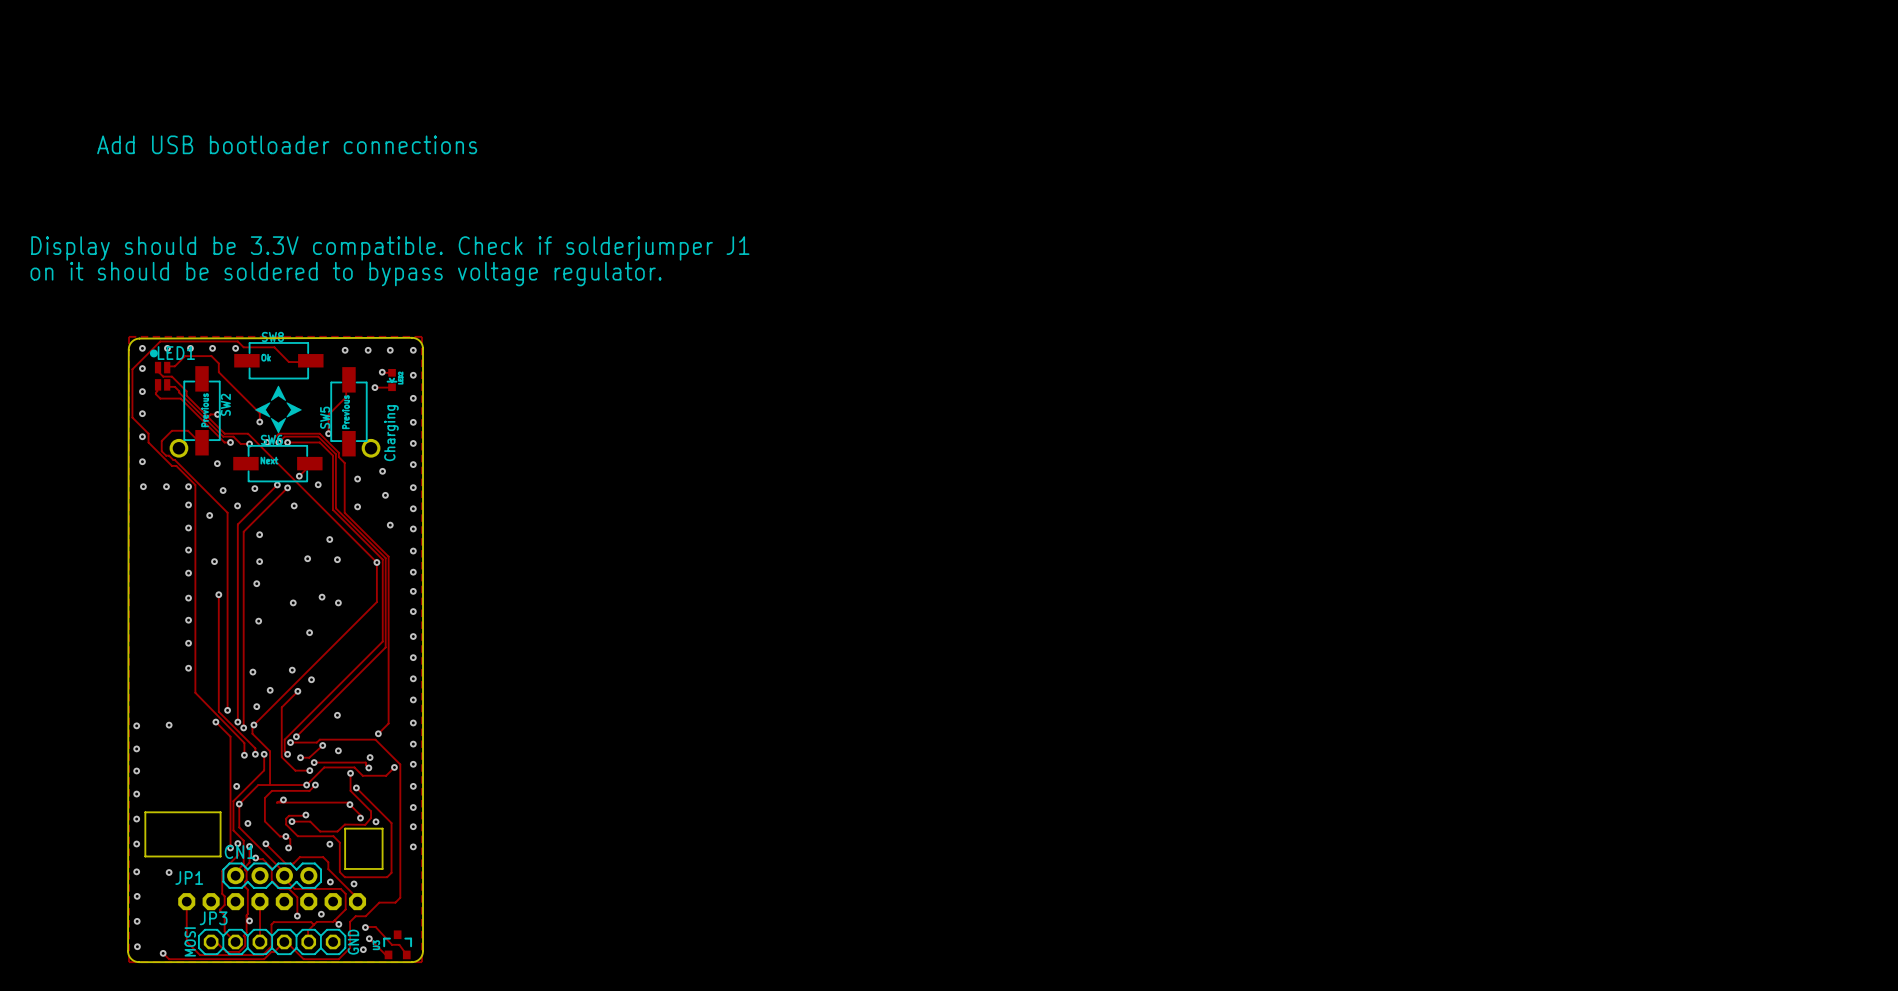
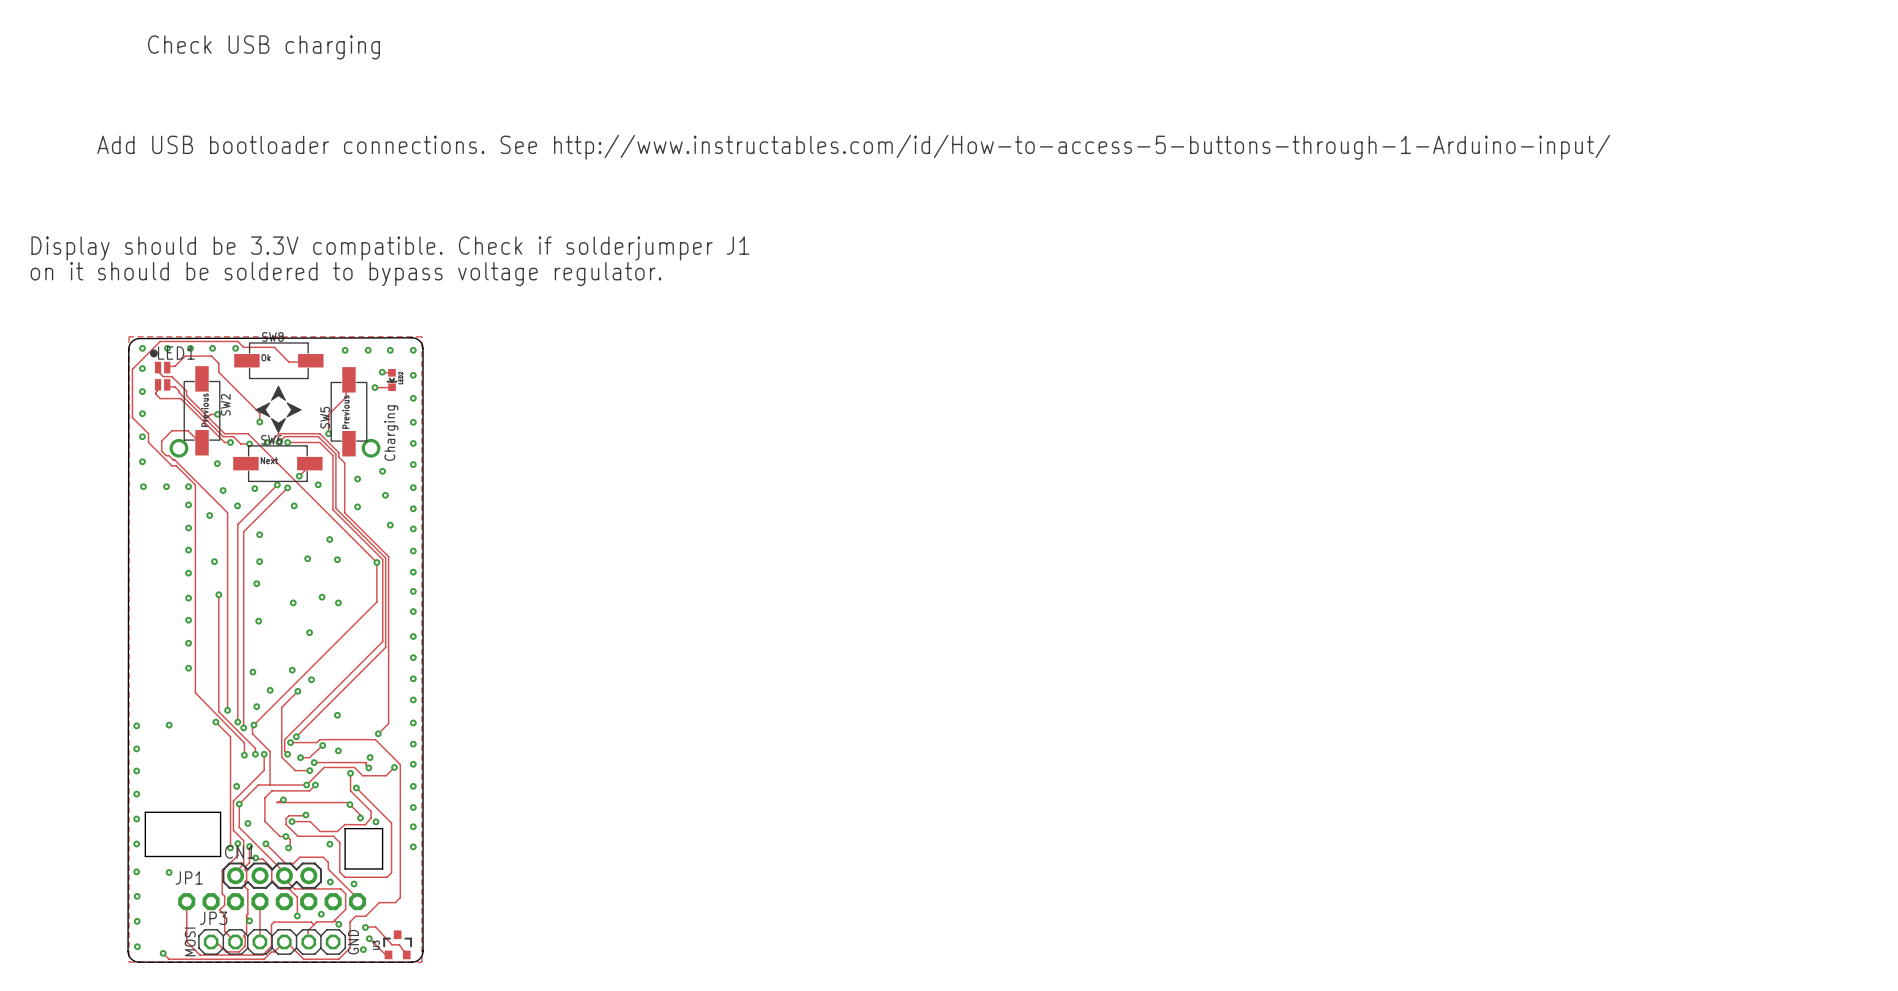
text: none -> Check USB charging (263, 47)
text: Add USB bootloader connections (287, 144) -> Add USB bootloader connections. See http://www.instructables.com/id/How-to-access-5-buttons-through-1-Arduino-input/ (853, 147)

